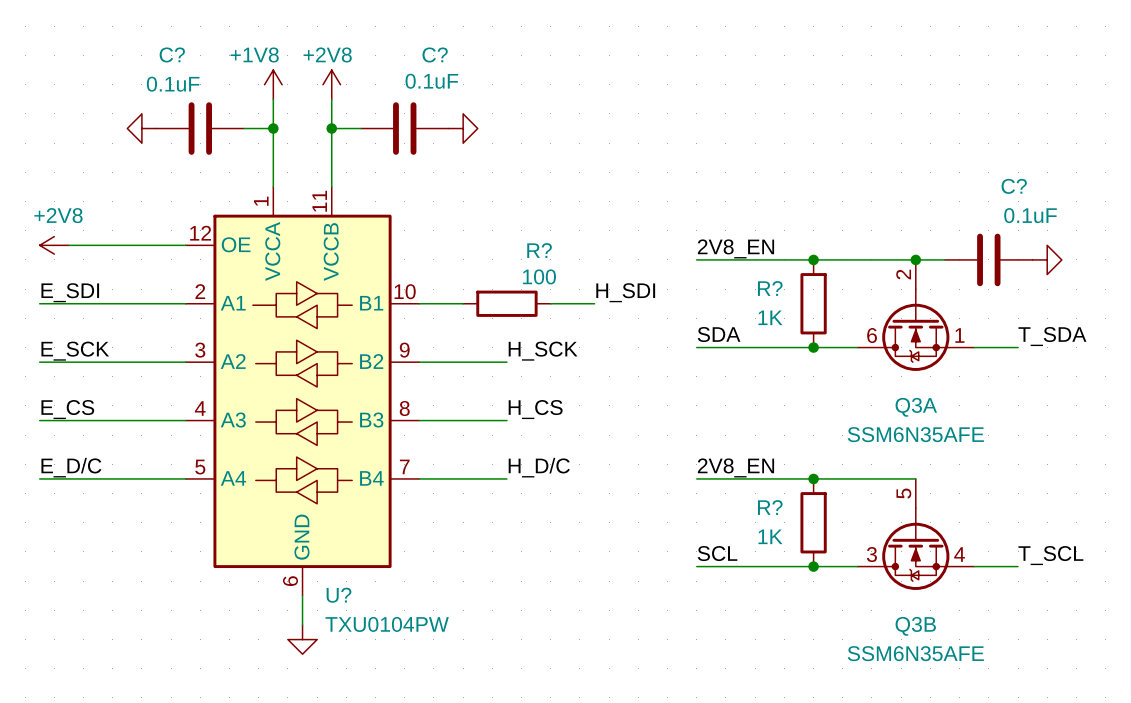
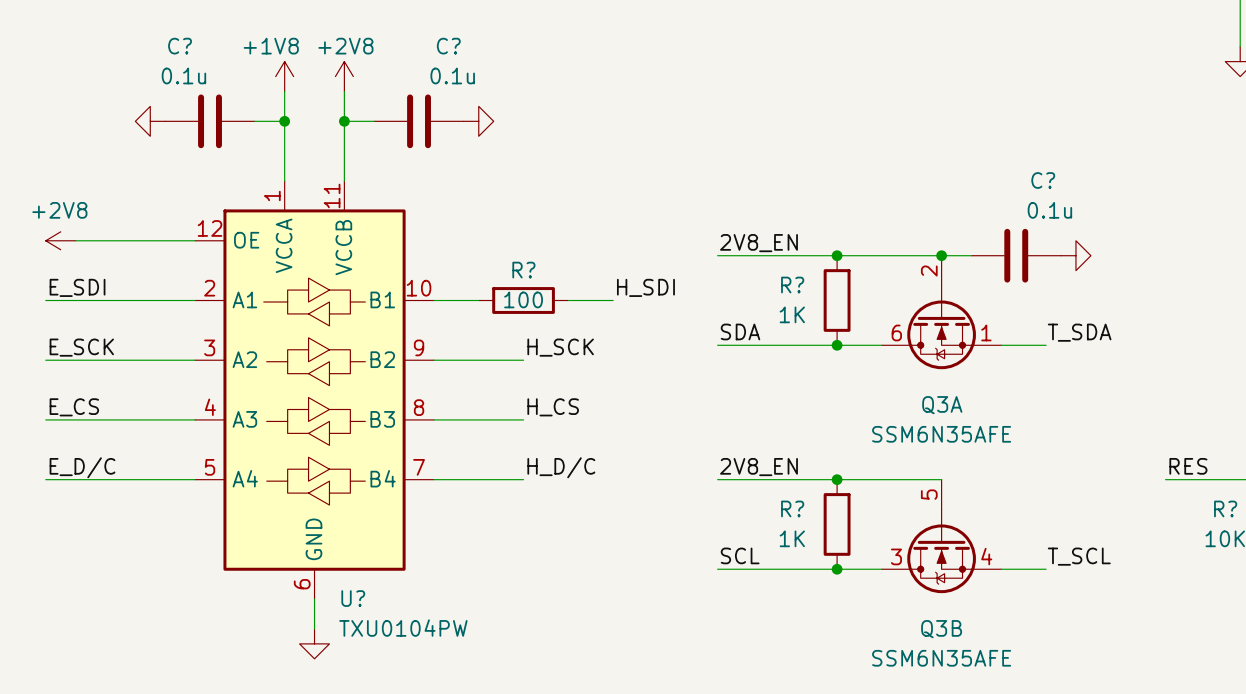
C? value: 0.1uF (431, 81) -> 0.1u (452, 75)
C? value: 0.1uF (173, 84) -> 0.1u (183, 75)
C? value: 0.1uF (1030, 215) -> 0.1u (1049, 210)
R? name position: R? (539, 250) -> R? (523, 270)
R? value position: 100 (539, 276) -> 100 (523, 299)

